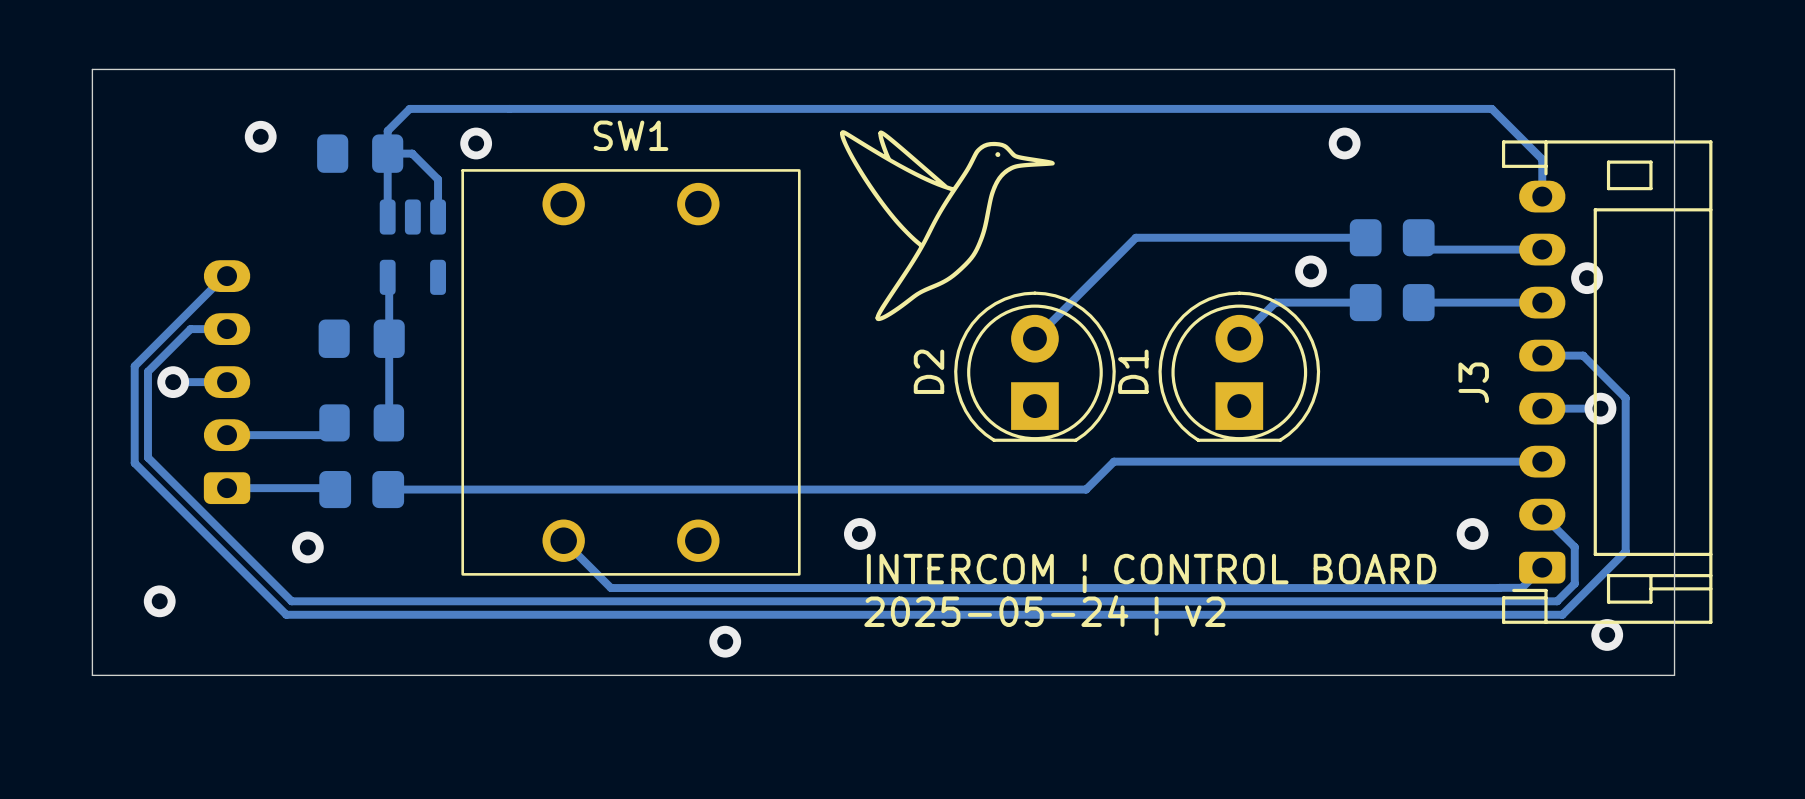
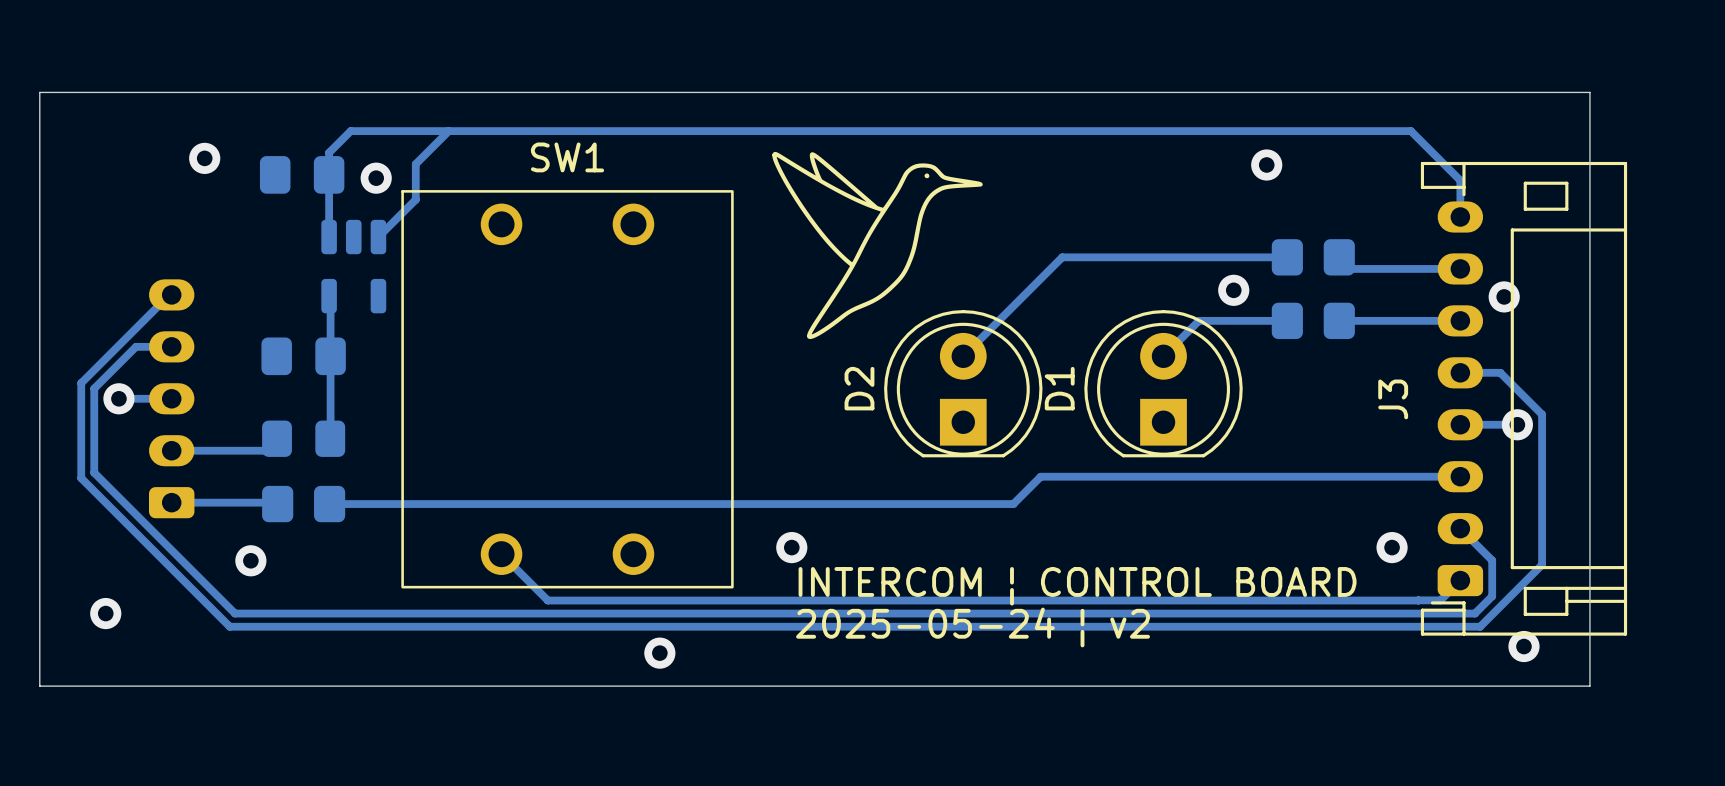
via position: (476, 143) -> (376, 178)
bottom track: (387, 153) (412, 153) (438, 179) (438, 217) -> (448, 131) (415, 164) (415, 199) (378, 237)

